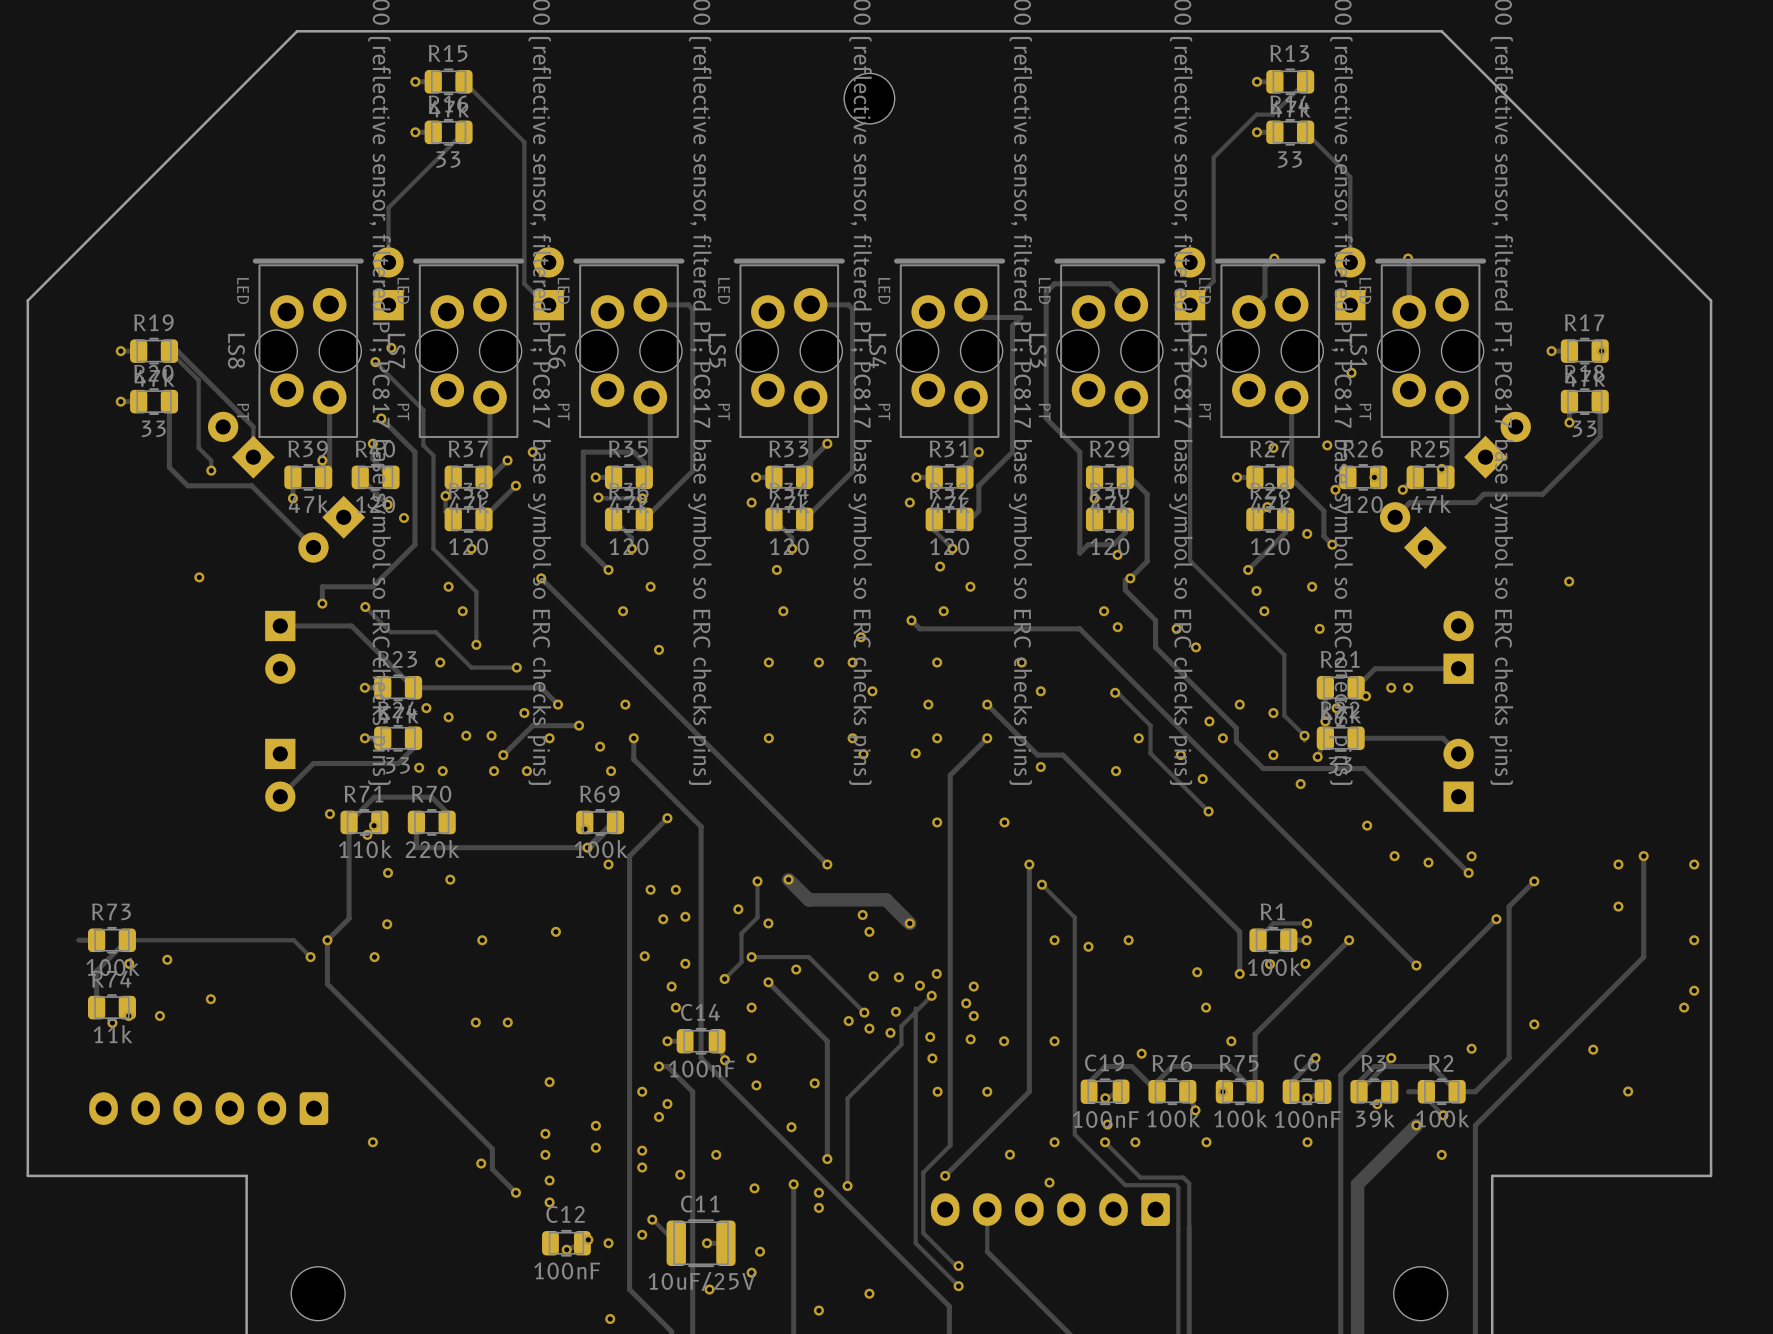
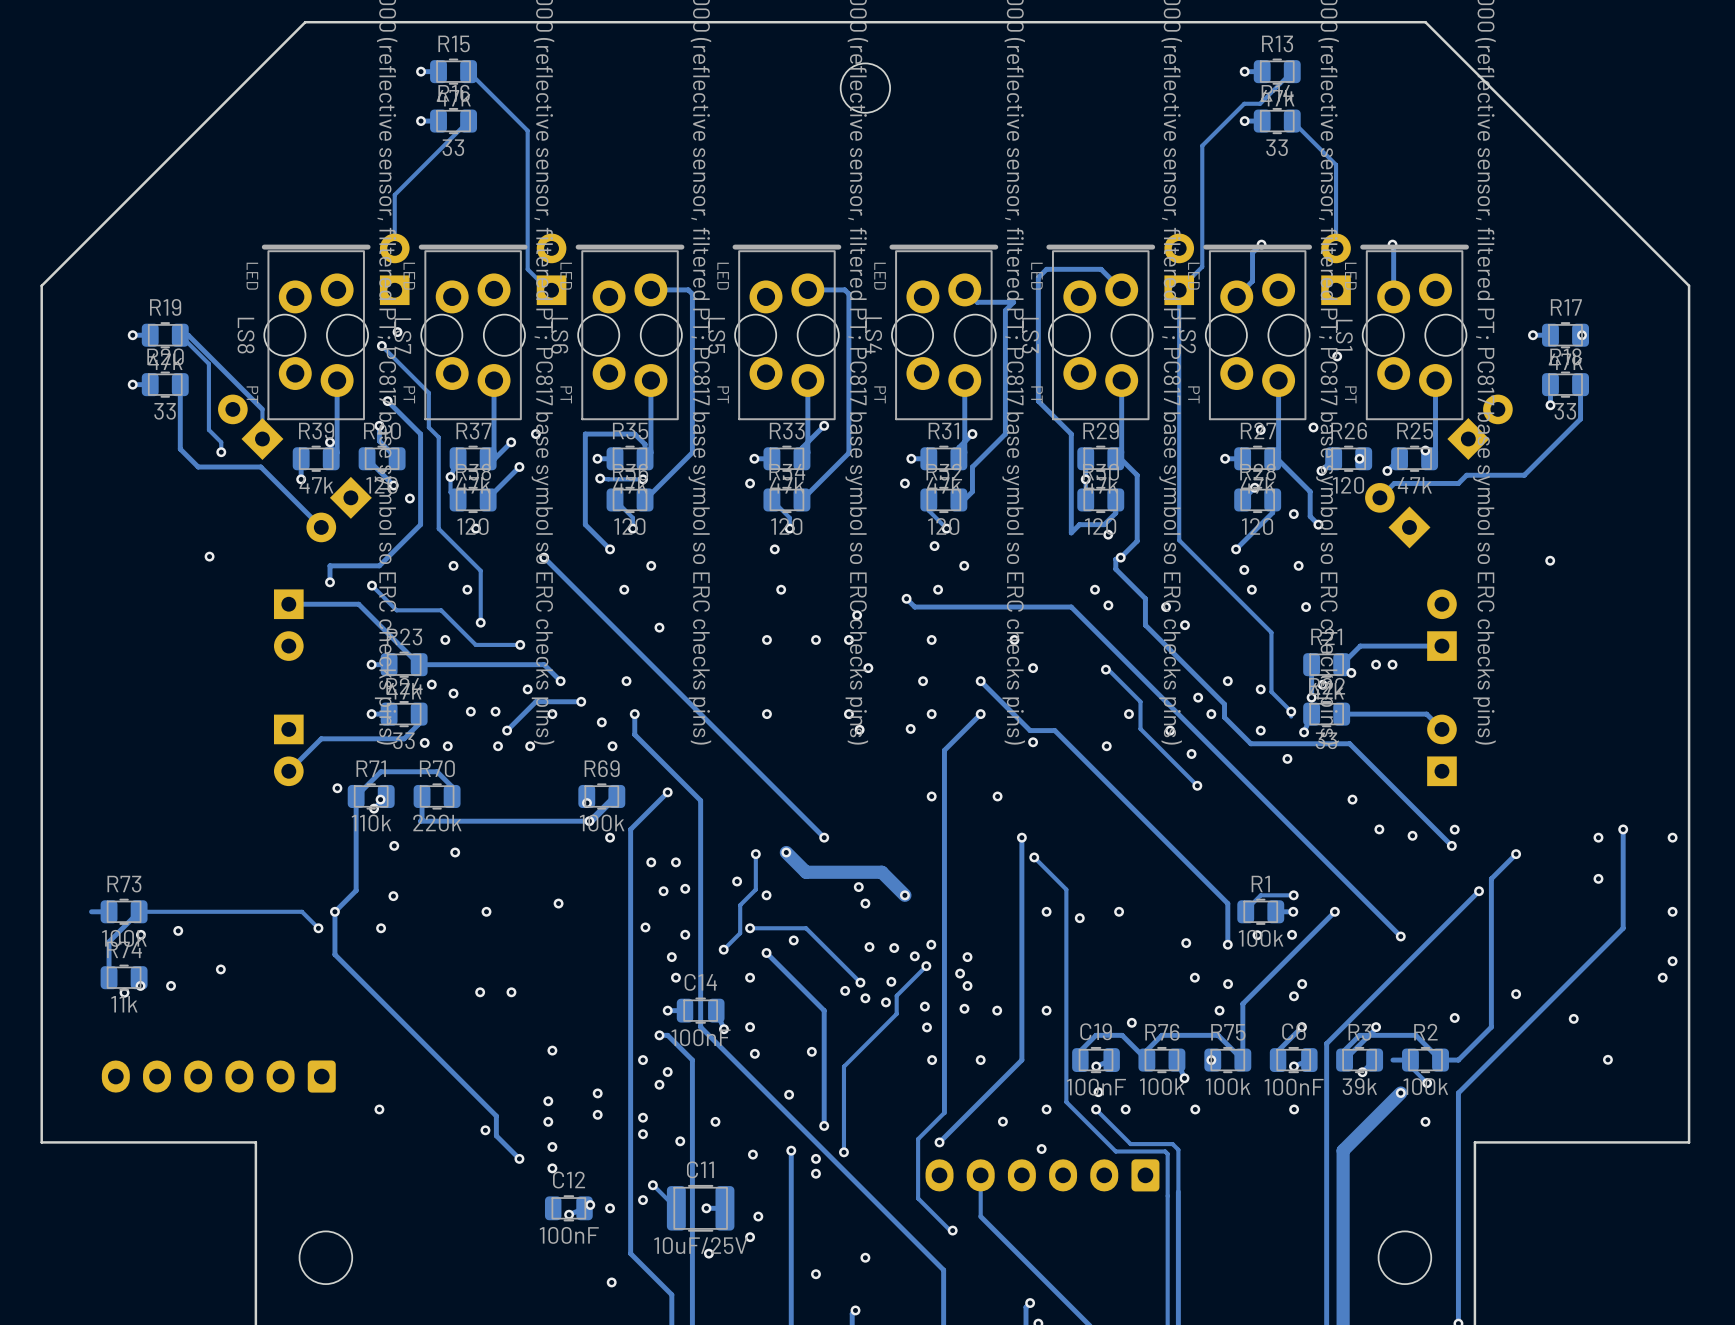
track: (915, 1008) (915, 1243) (958, 1286) -> none
via: none -> (1228, 984)
via: none -> (1302, 984)
via: none -> (1293, 996)
via: (958, 1286) -> none

